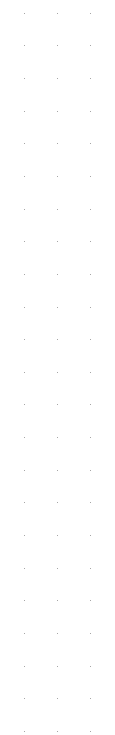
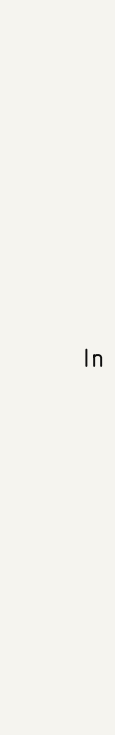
label: none -> In (93, 357)

